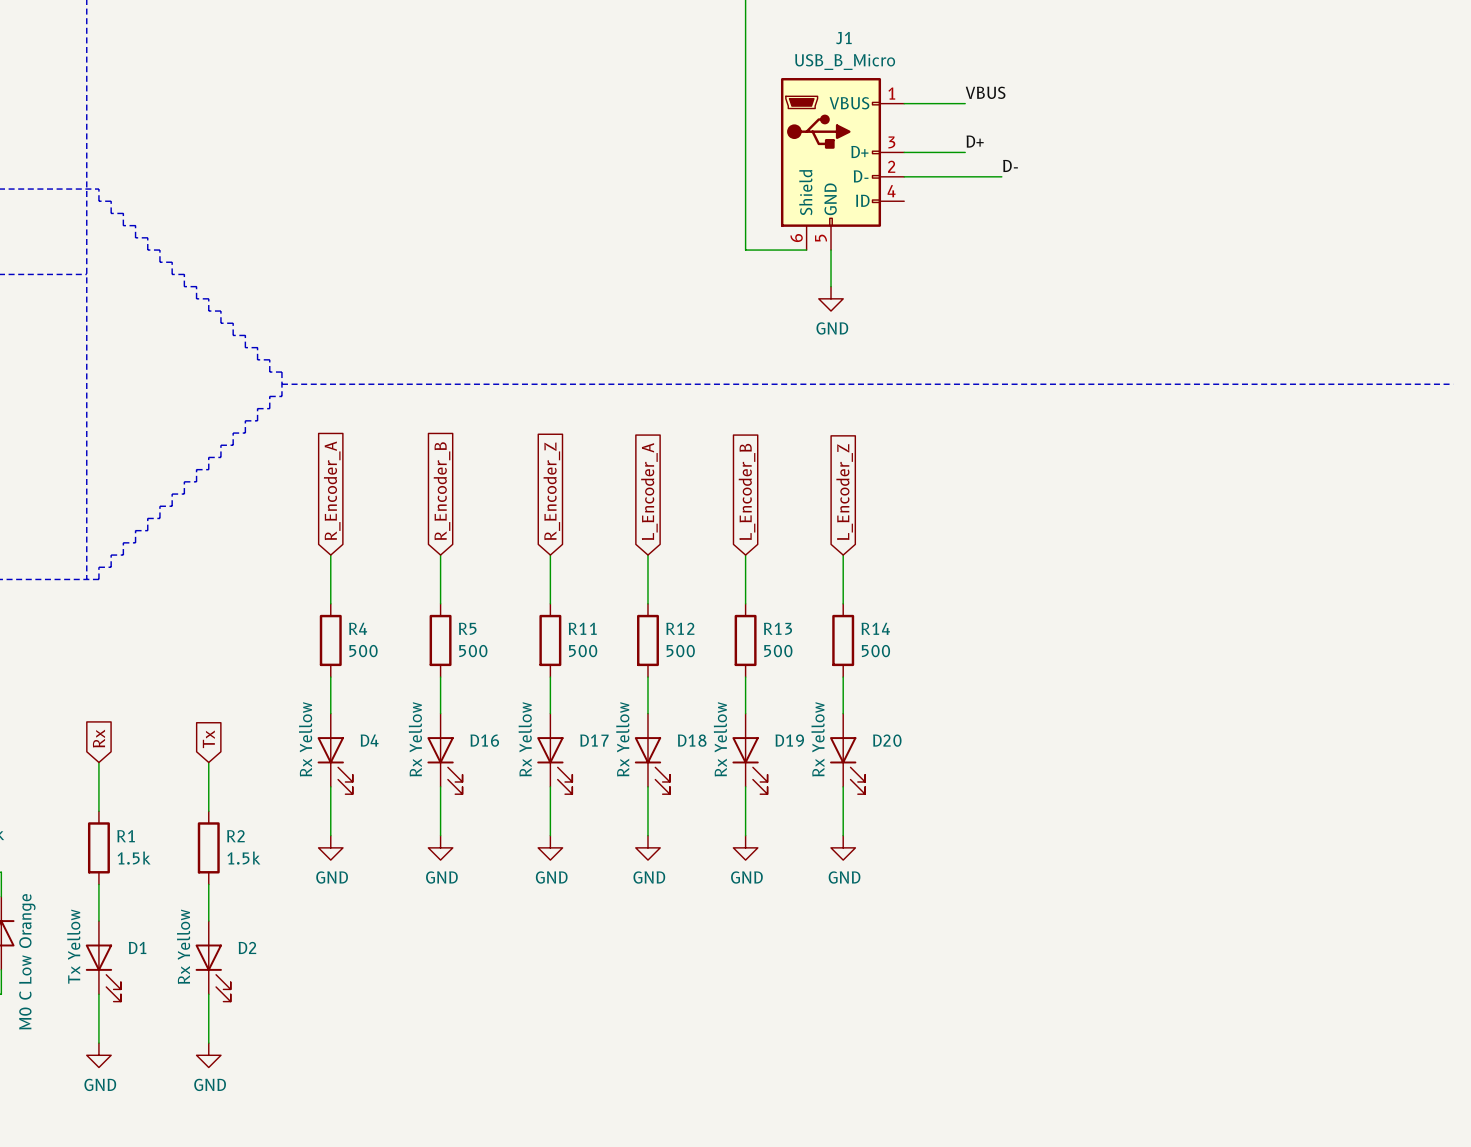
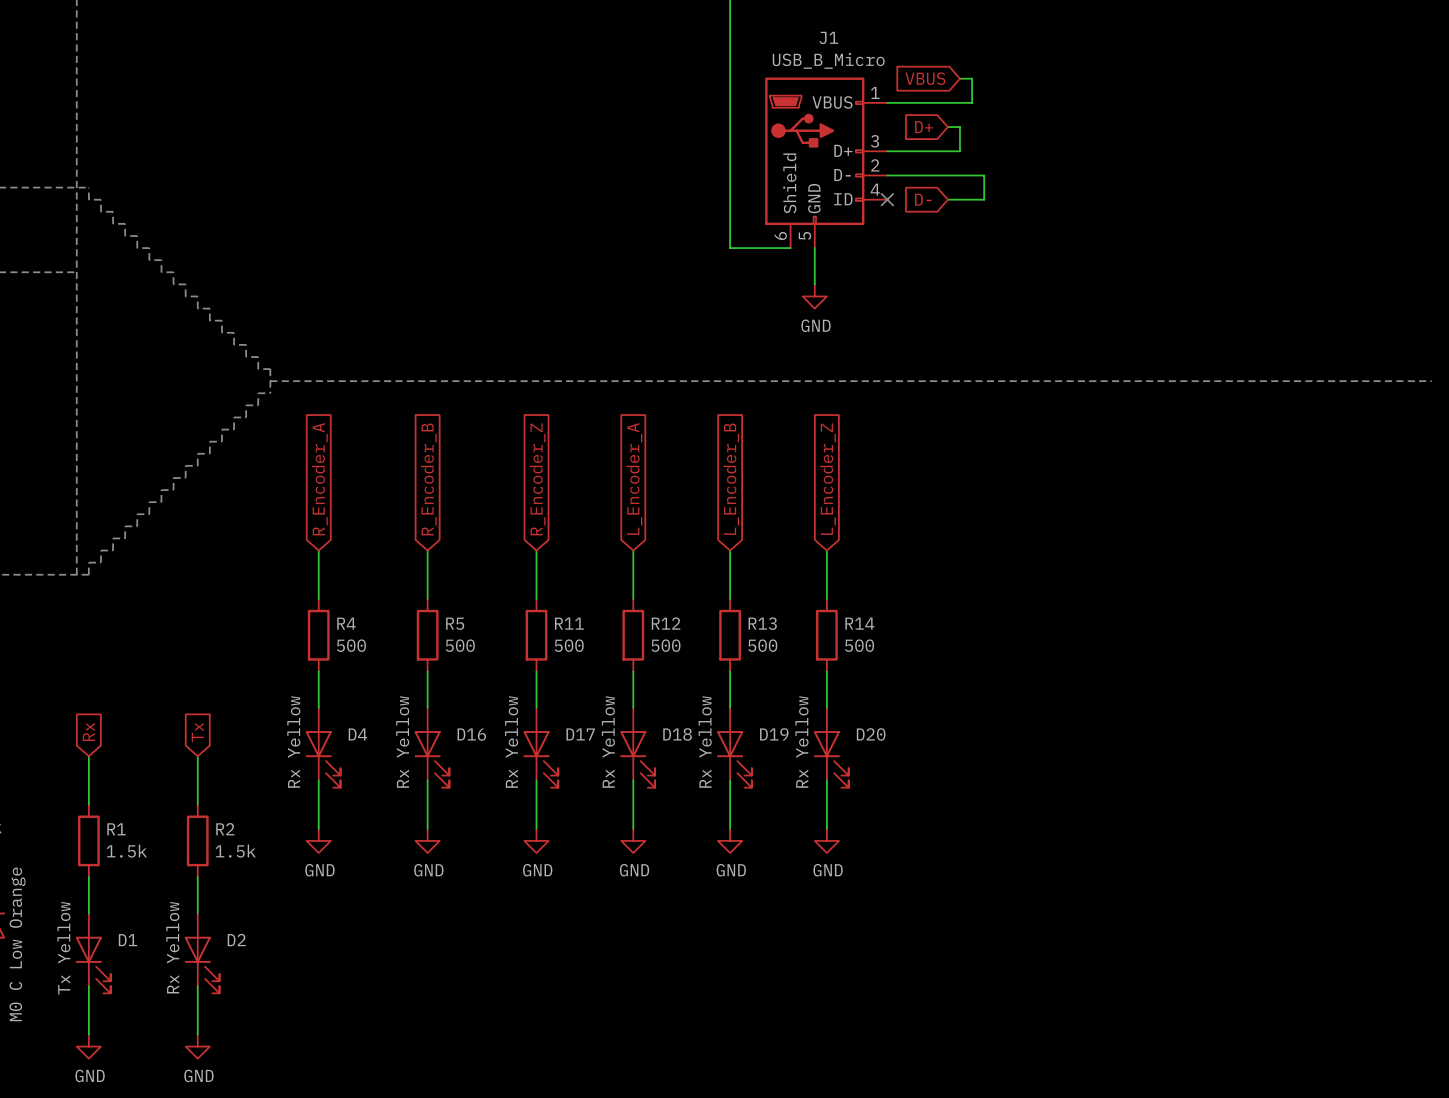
global label: none -> VBUS (925, 78)
wire: none -> (959, 78) (972, 78) (972, 102) (947, 102)
label: VBUS (985, 92) -> none
global label: none -> D+ (924, 127)
wire: none -> (947, 127) (959, 127) (959, 151) (947, 151)
label: D+ (975, 141) -> none
label: D- (1010, 165) -> none
wire: none -> (984, 175) (984, 199) (947, 199)
no-connect mark: none -> (887, 199)
global label: none -> D- (923, 199)

